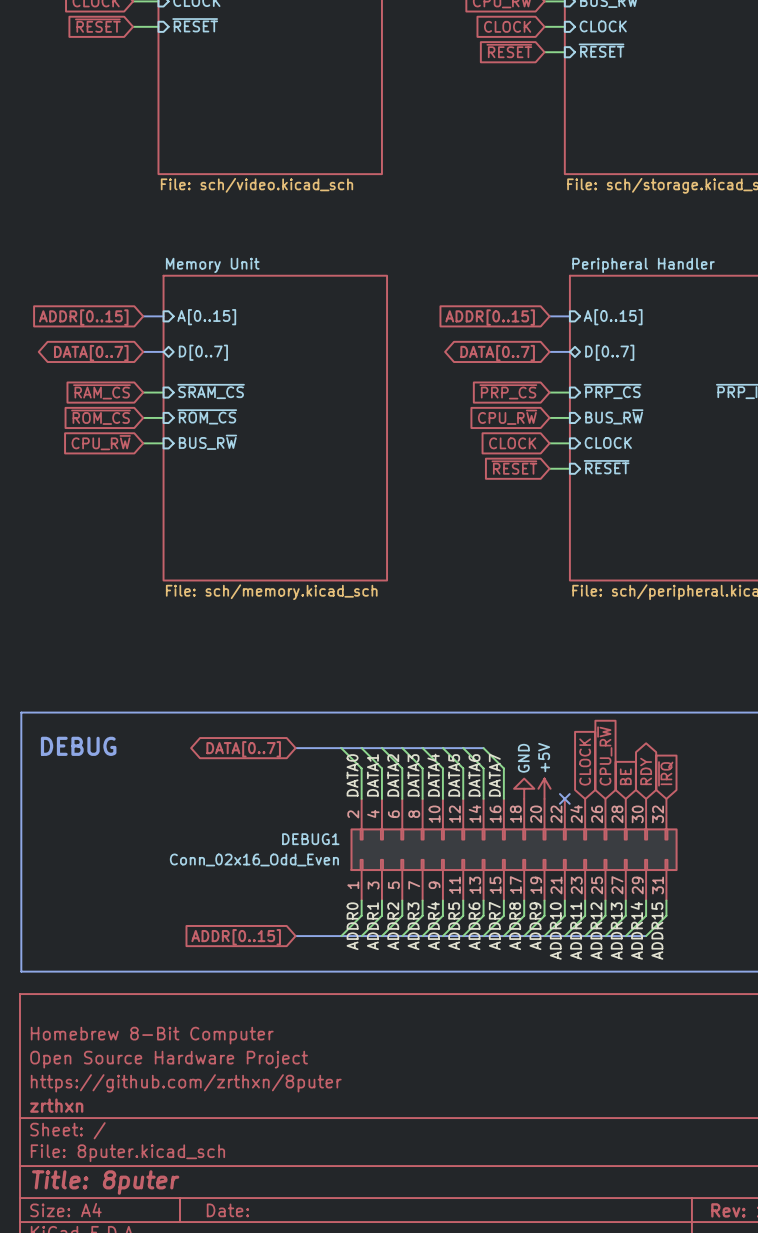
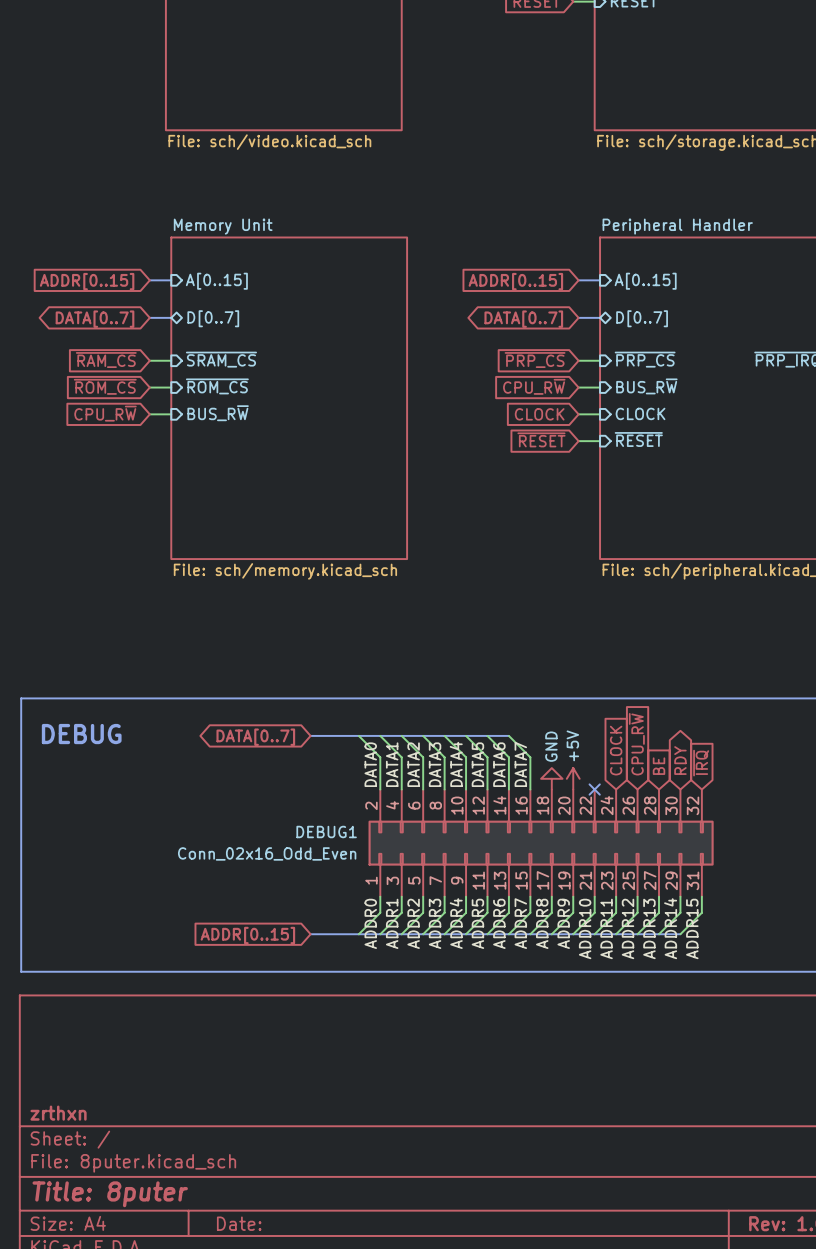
title block: Homebrew 8-Bit Computer (152, 1035) -> none
title block: Open Source Hardware Project (169, 1059) -> none
title block: https://github.com/zrthxn/8puter (186, 1083) -> none

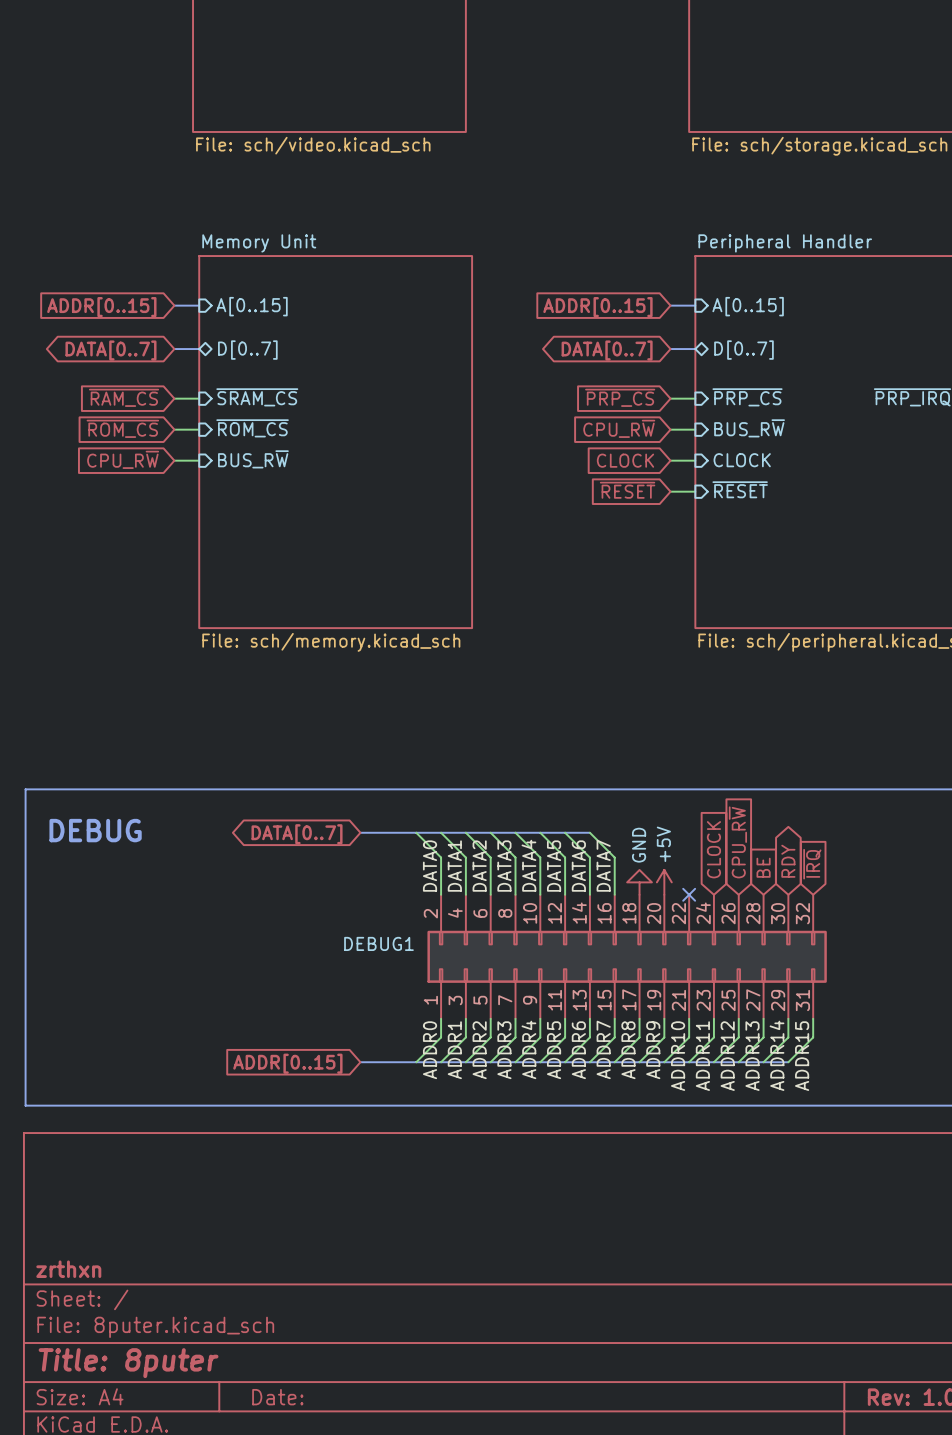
DEBUG1 value: Conn_02x16_Odd_Even (267, 853) -> none

